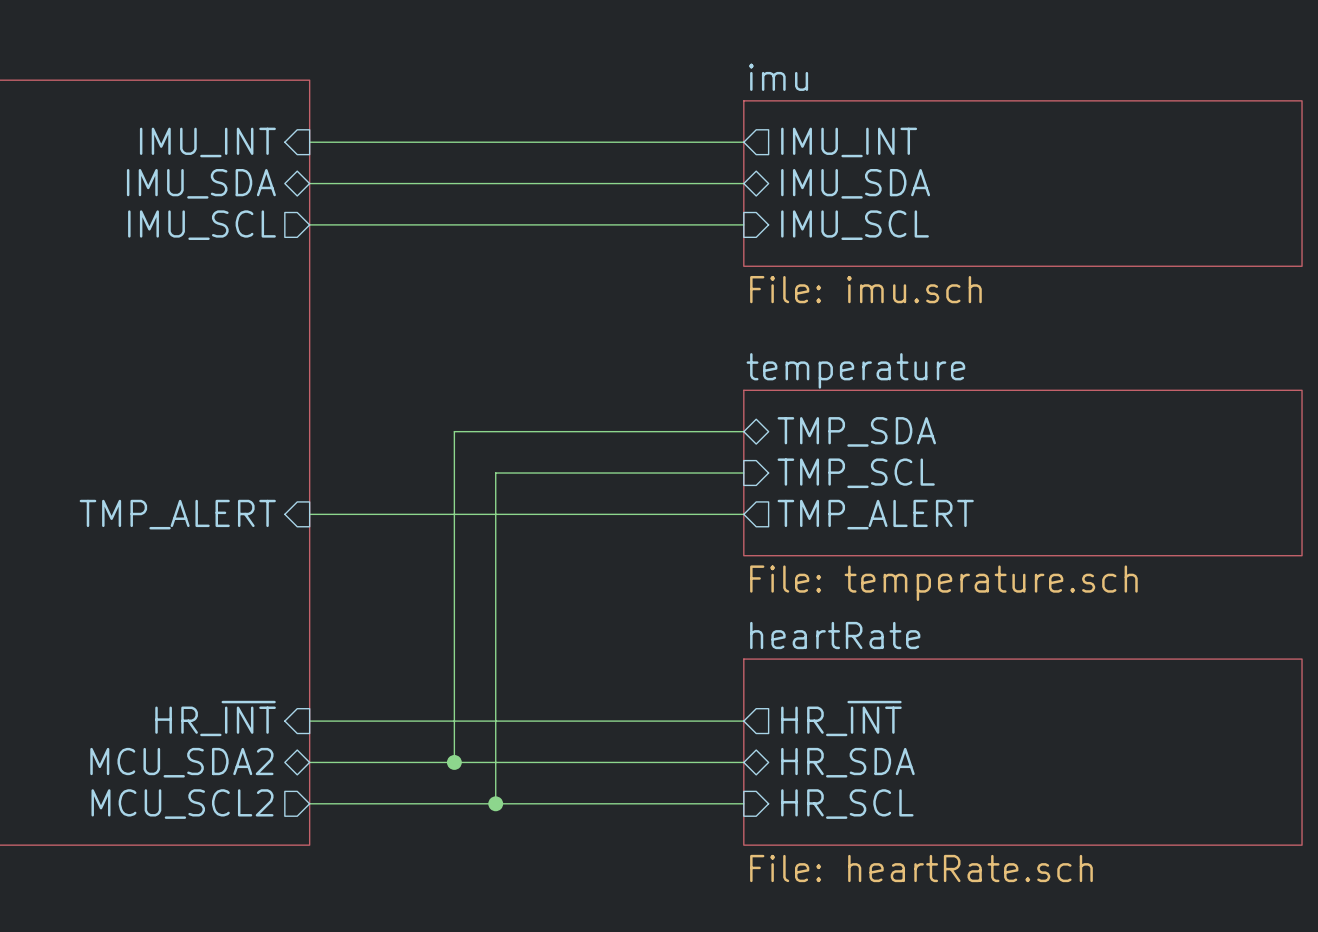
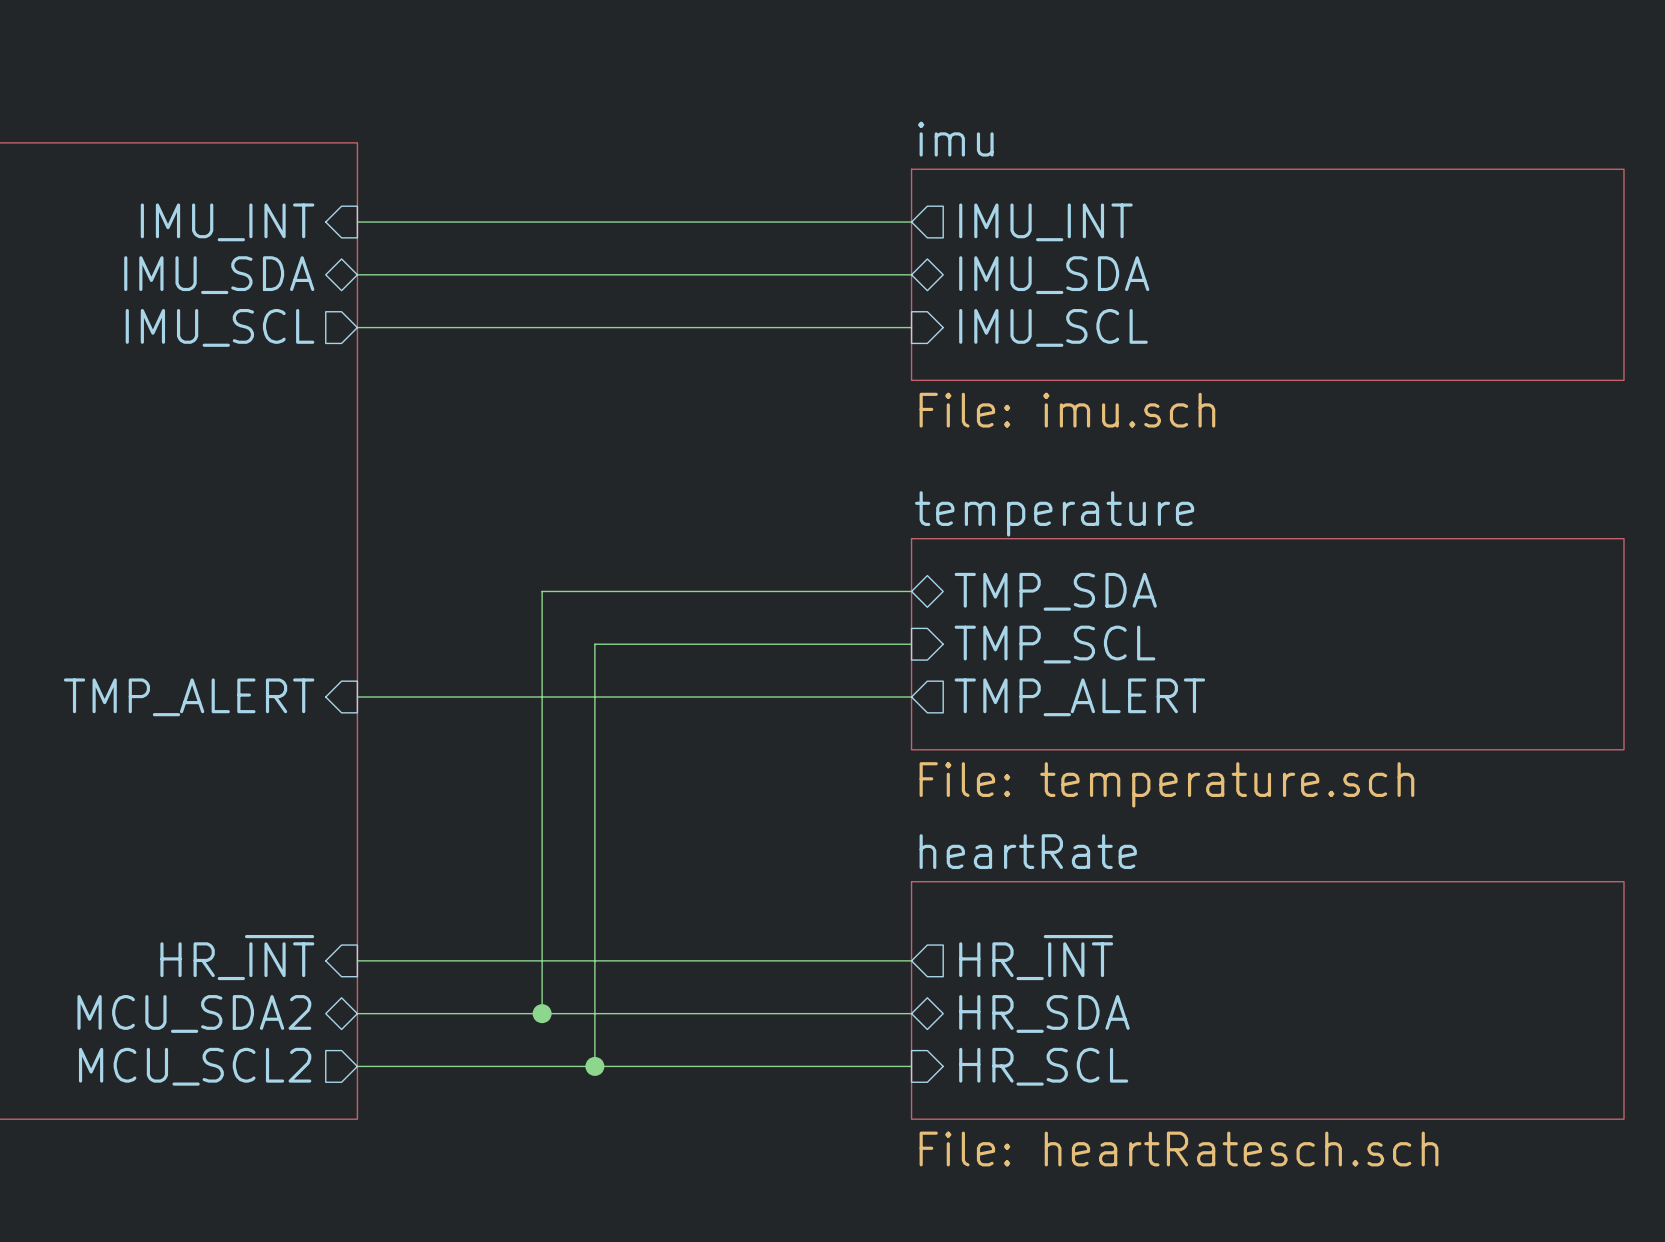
sheet heartRate value: File: heartRate.sch (921, 868) -> File: heartRatesch.sch (1179, 1149)

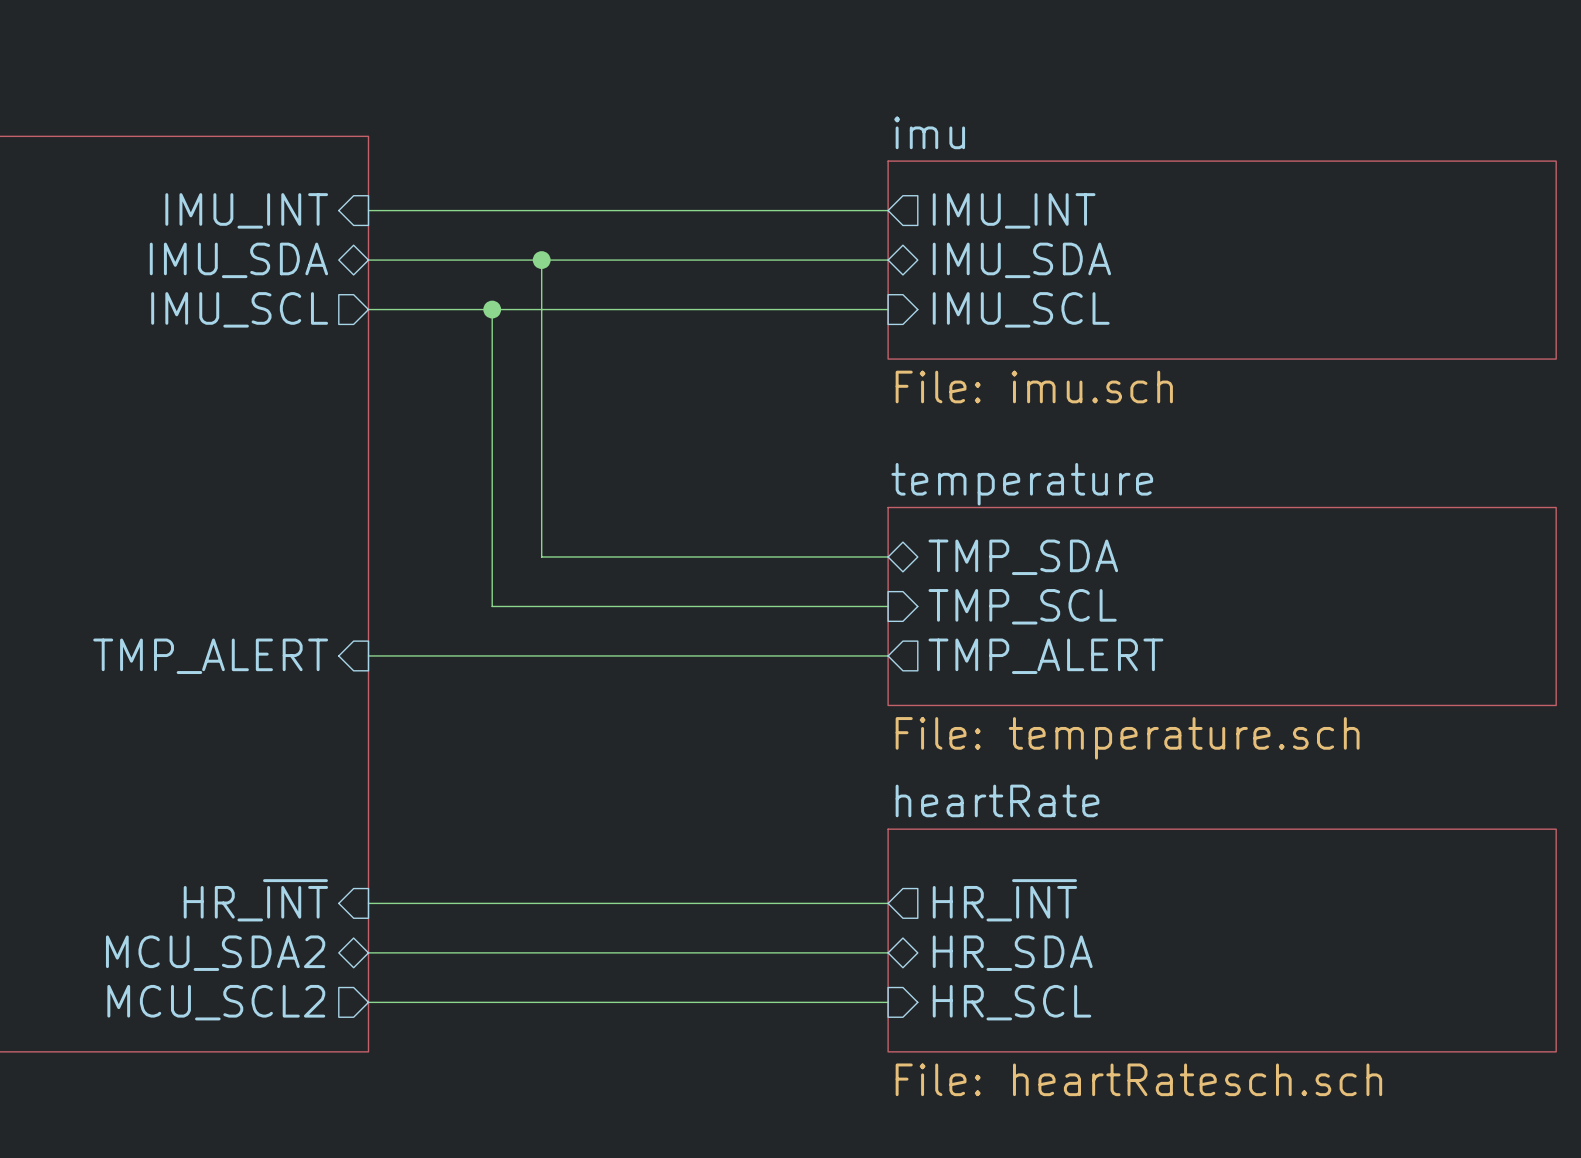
junction: none -> (541, 260)
junction: none -> (492, 309)
wire: (542, 591) (542, 1013) -> (541, 556) (541, 260)
wire: (594, 644) (594, 1066) -> (591, 606) (492, 606) (492, 309)
junction: (542, 1013) -> none
junction: (594, 1066) -> none

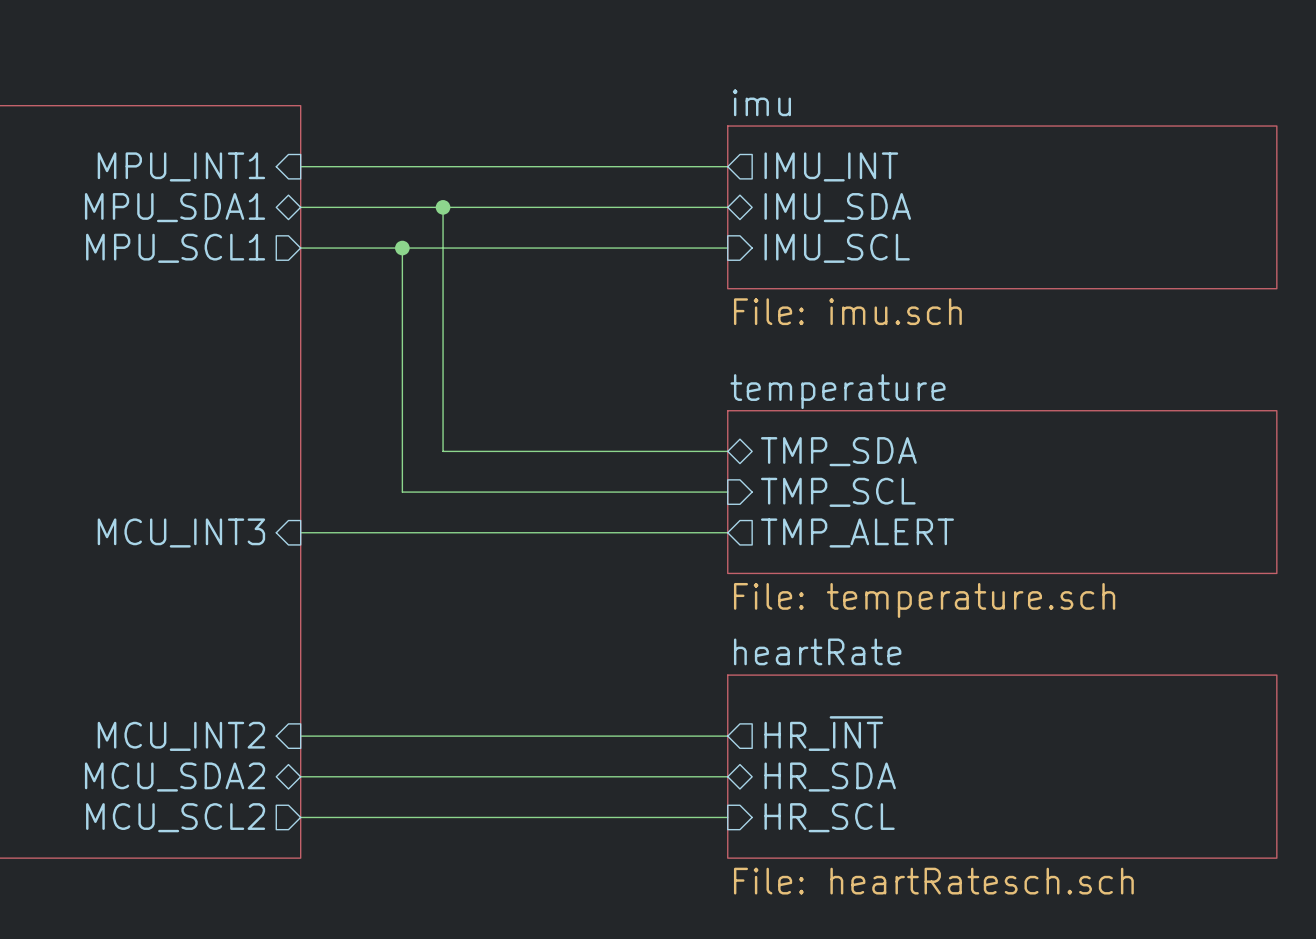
sheet pin: IMU_INT (246, 210) -> MPU_INT1 (181, 166)
sheet pin: IMU_SDA (238, 260) -> MPU_SDA1 (175, 207)
sheet pin: IMU_SCL (239, 309) -> MPU_SCL1 (175, 248)
sheet pin: TMP_ALERT (210, 656) -> MCU_INT3 (181, 532)
sheet pin: HR_~{INT} (255, 900) -> MCU_INT2 (181, 736)

